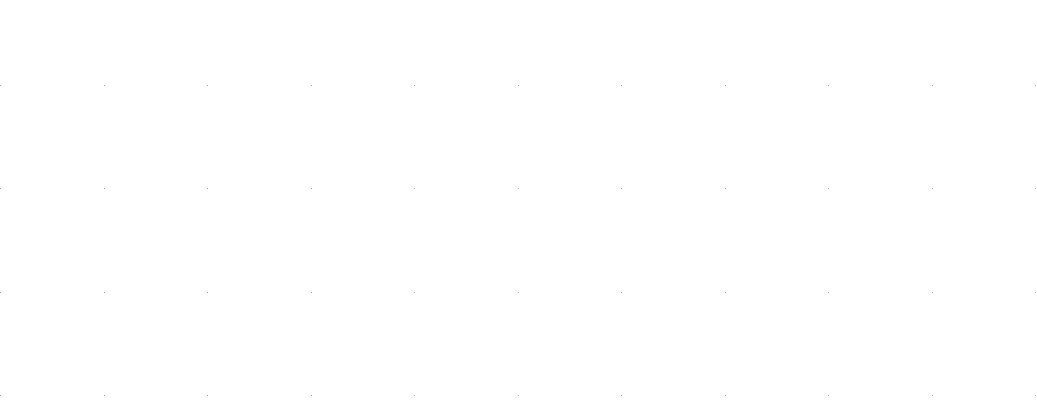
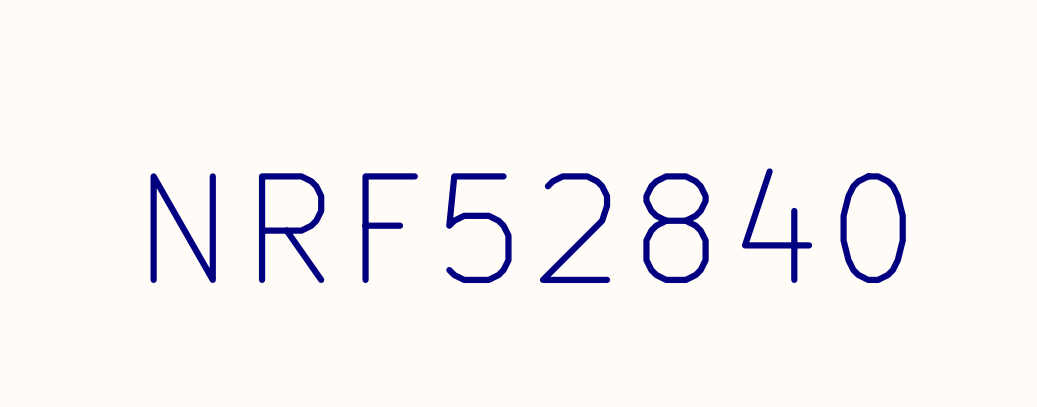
text: none -> NRF52840 (528, 225)

